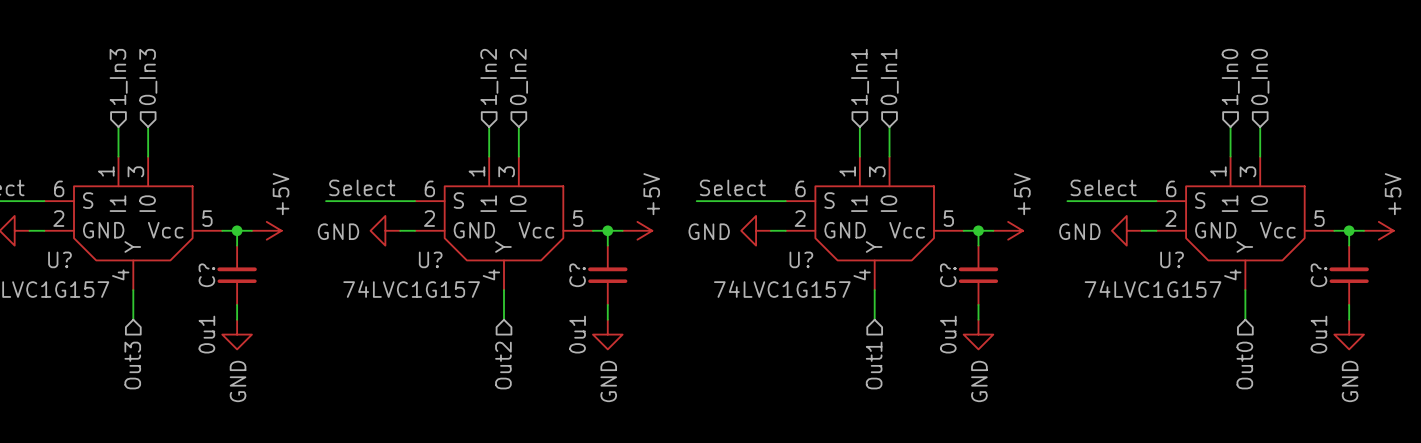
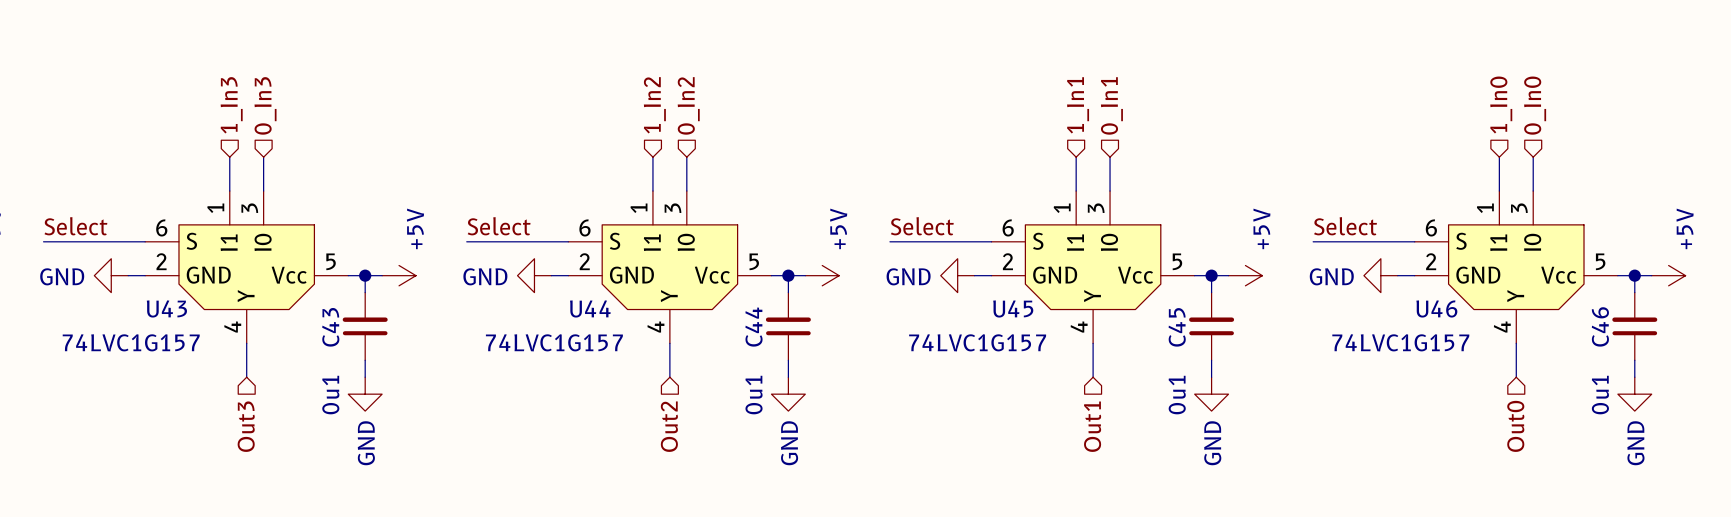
U? name: U? (59, 259) -> U43 (166, 308)
U? name: U? (430, 259) -> U44 (590, 308)
U? name: U? (801, 259) -> U45 (1013, 308)
U? name: U? (1172, 259) -> U46 (1436, 308)
C? name: C? (206, 275) -> C43 (330, 327)
C? name: C? (577, 275) -> C44 (753, 327)
C? name: C? (948, 275) -> C45 (1177, 327)
C? name: C? (1318, 275) -> C46 (1600, 326)

